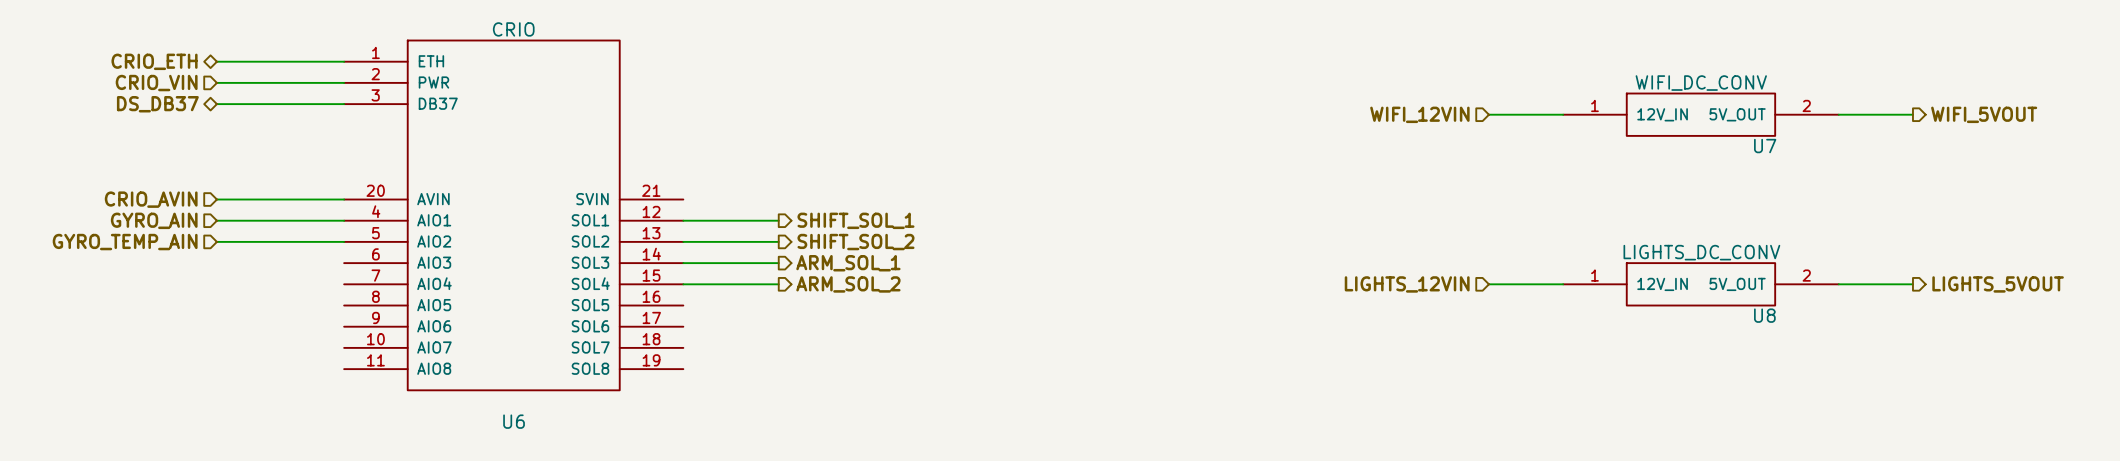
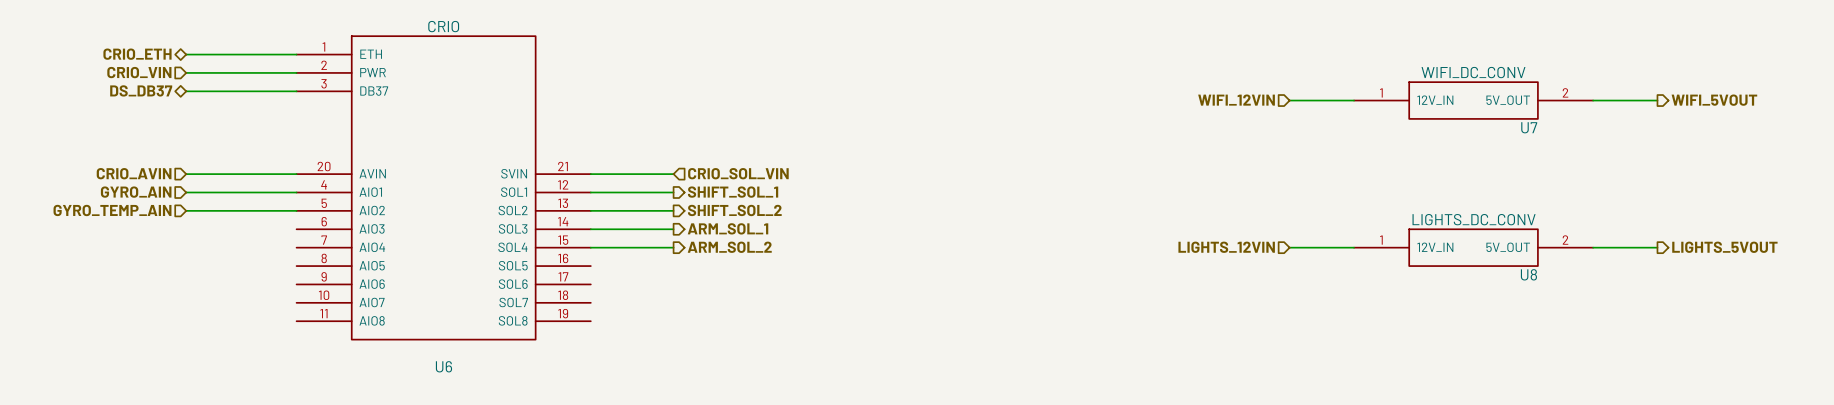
wire: none -> (590, 174) (673, 174)
hierarchical label: none -> CRIO_SOL_VIN (738, 173)

